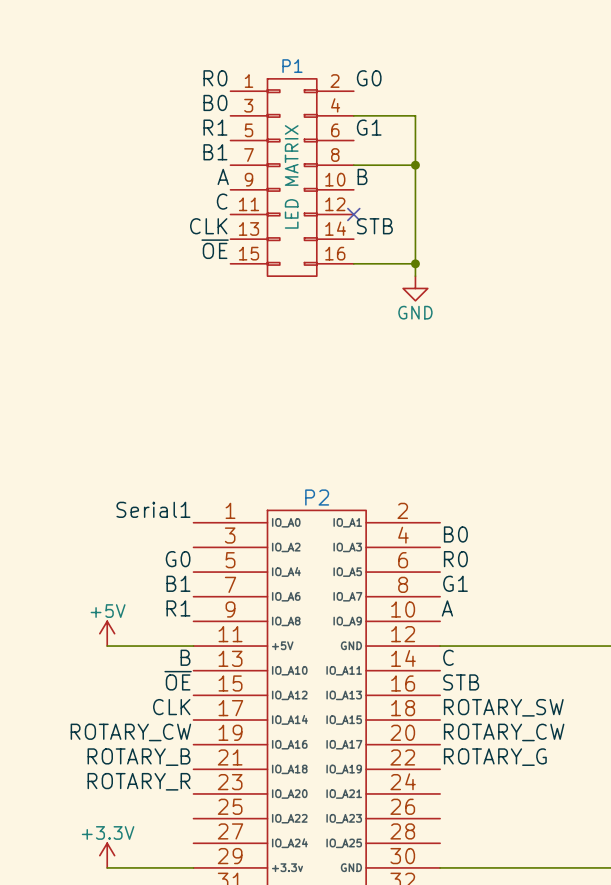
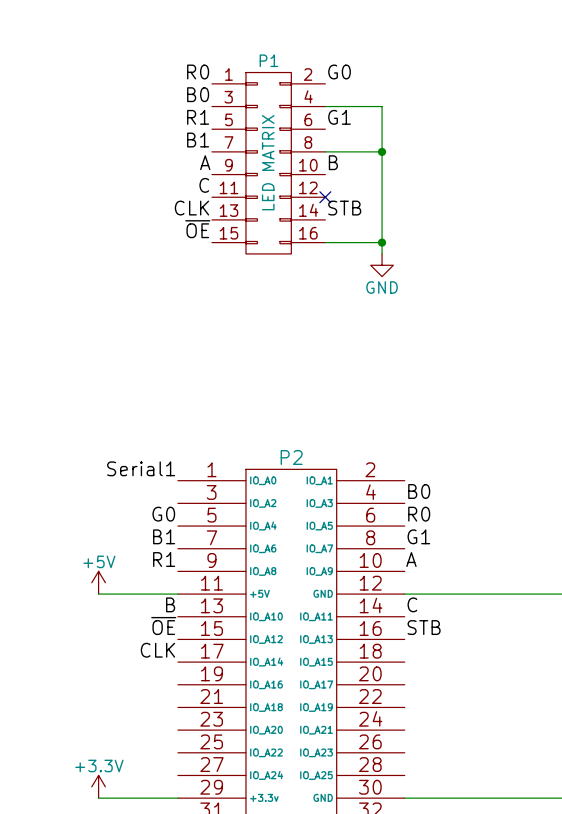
label: ROTARY_SW (503, 707) -> none
label: ROTARY_CW (130, 732) -> none
label: ROTARY_CW (504, 732) -> none
label: ROTARY_B (139, 757) -> none
label: ROTARY_G (495, 757) -> none
label: ROTARY_R (139, 781) -> none

